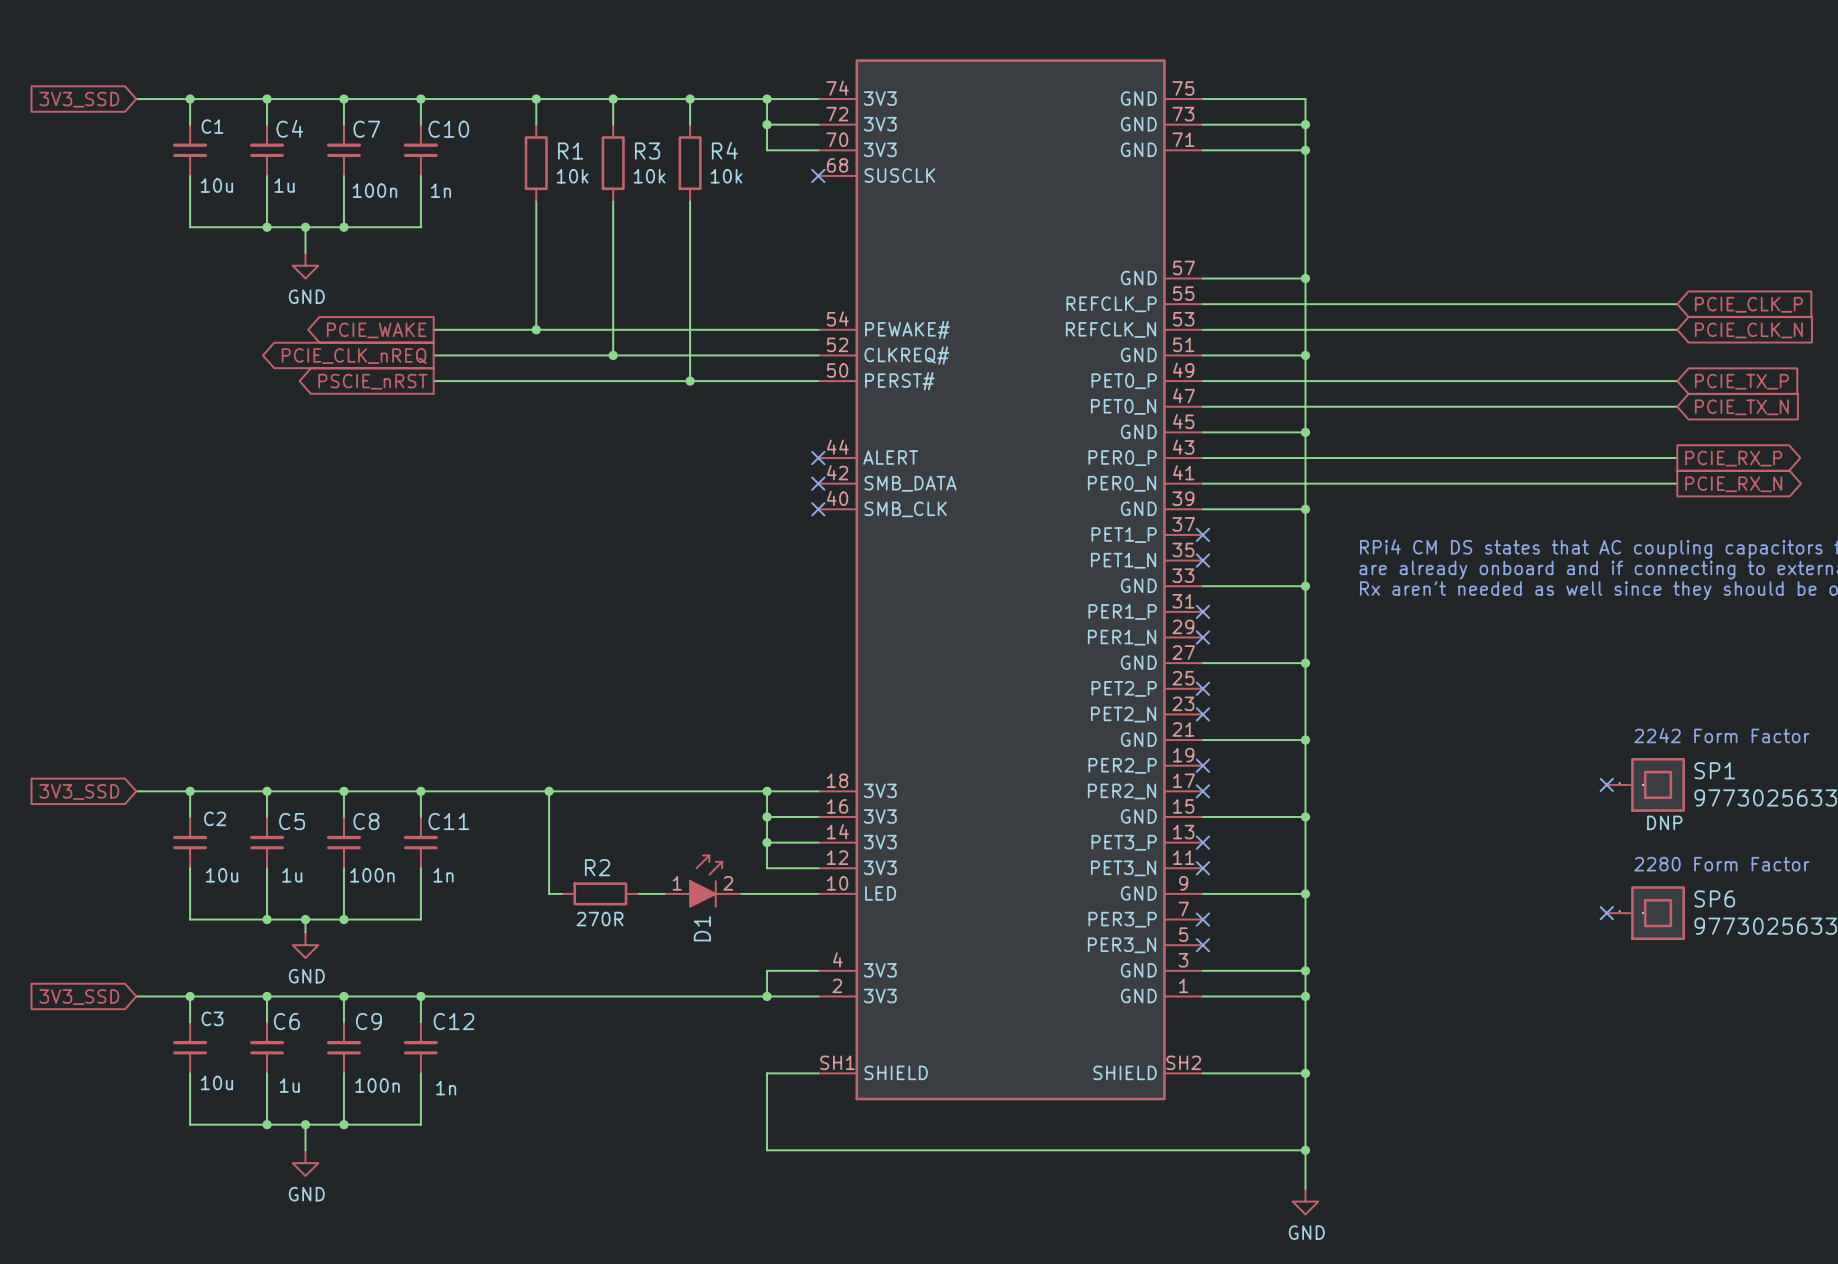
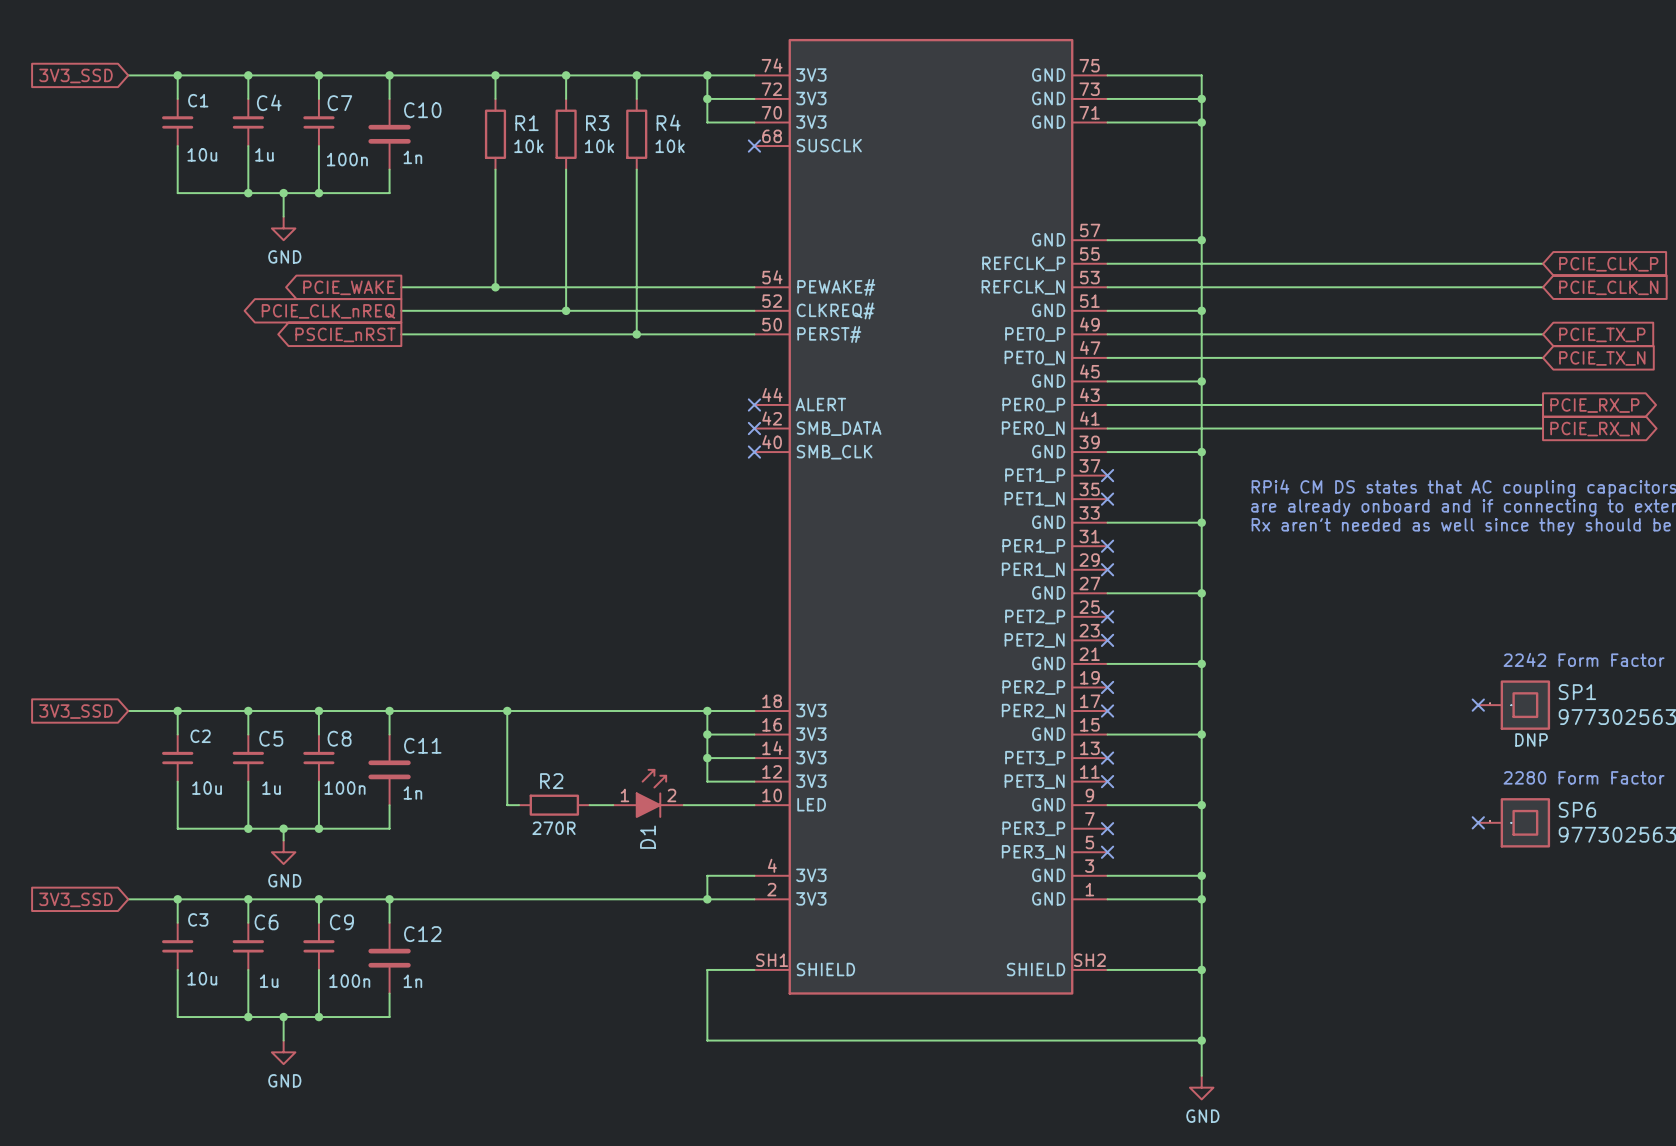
C10 symbol: [403, 124, 438, 176] -> [368, 98, 411, 170]
C11 symbol: [403, 816, 438, 869] -> [368, 734, 411, 806]
C12 symbol: [403, 1022, 438, 1074] -> [368, 922, 411, 994]

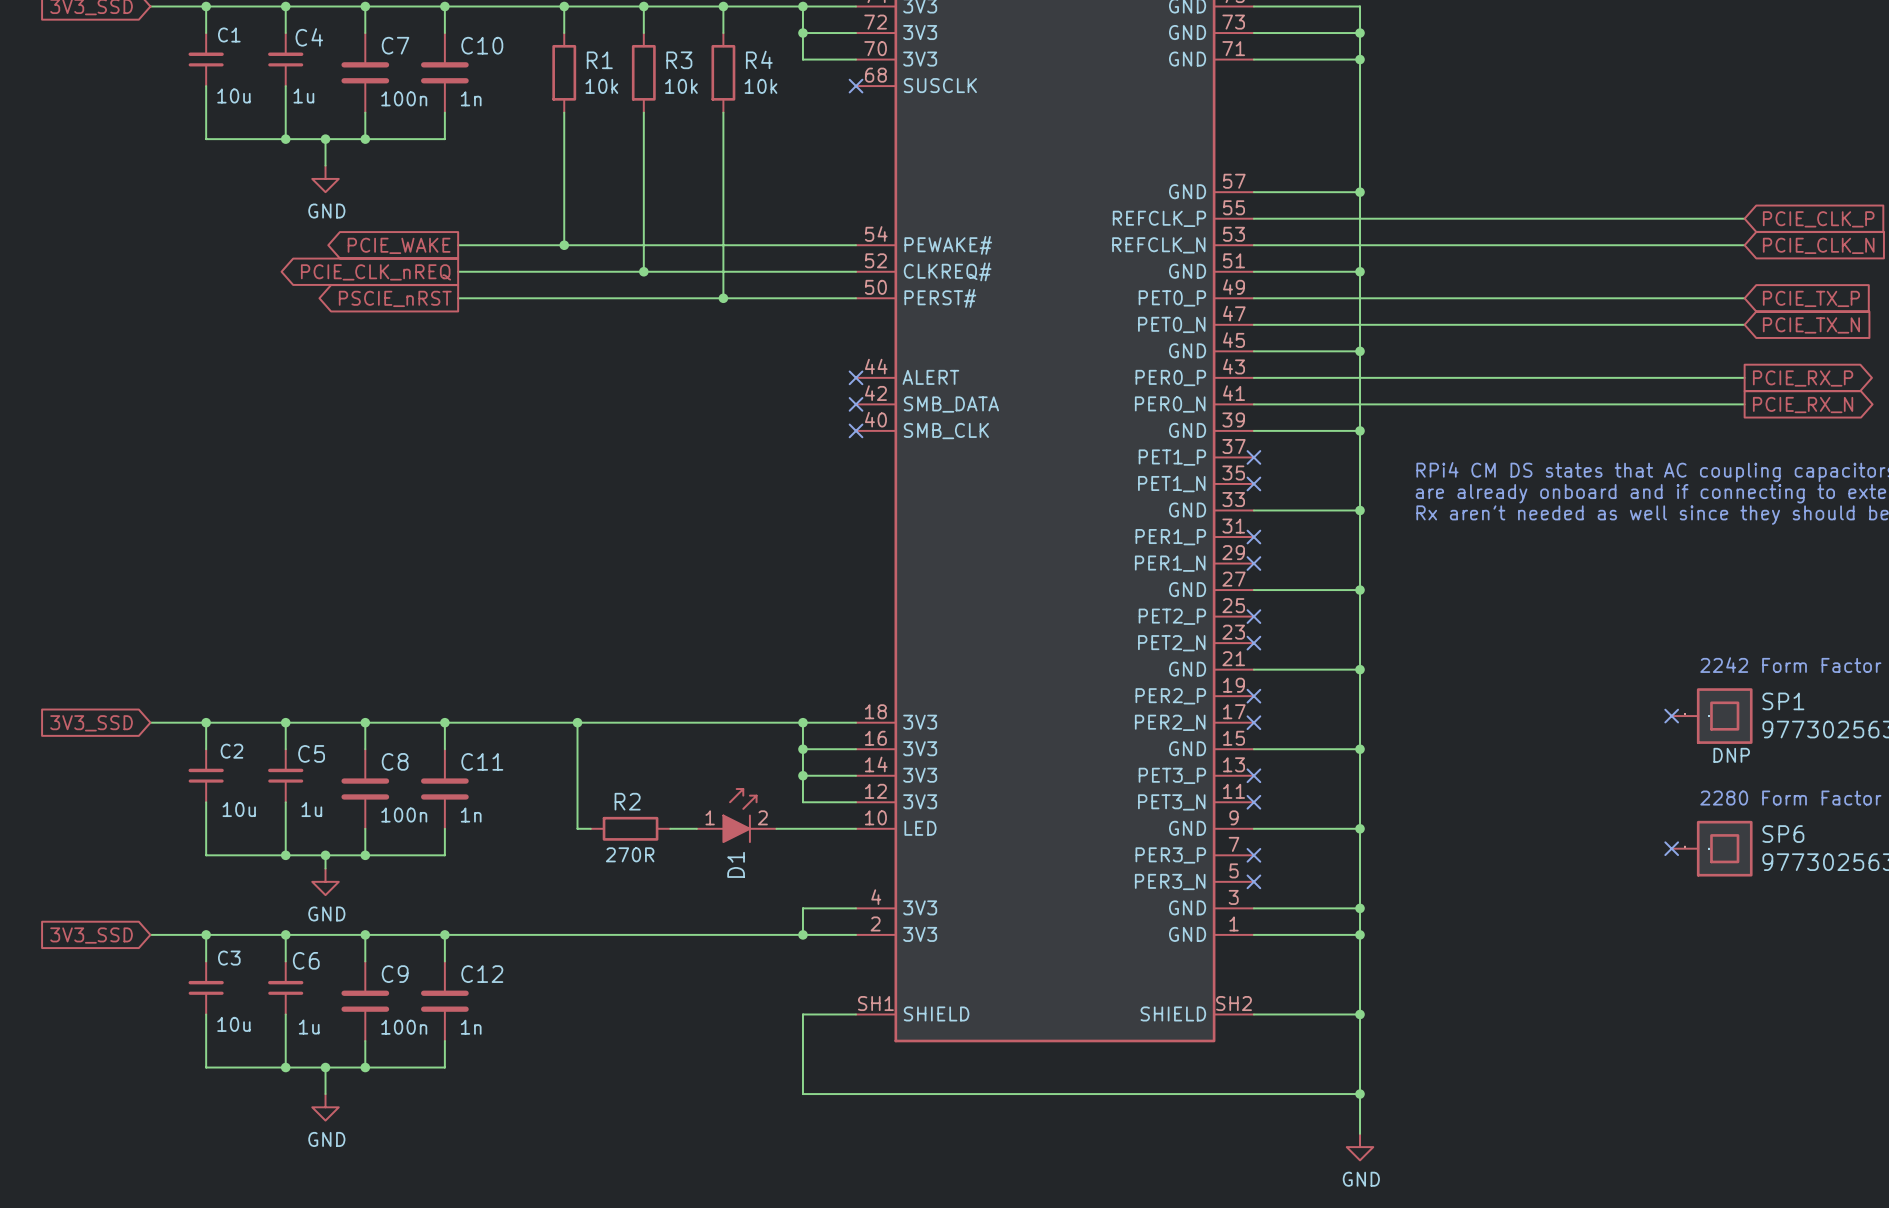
C7 symbol: [303, 98, 335, 147] -> [341, 33, 390, 113]
C8 symbol: [303, 734, 335, 782] -> [341, 749, 390, 829]
C9 symbol: [303, 922, 335, 970] -> [341, 961, 390, 1042]

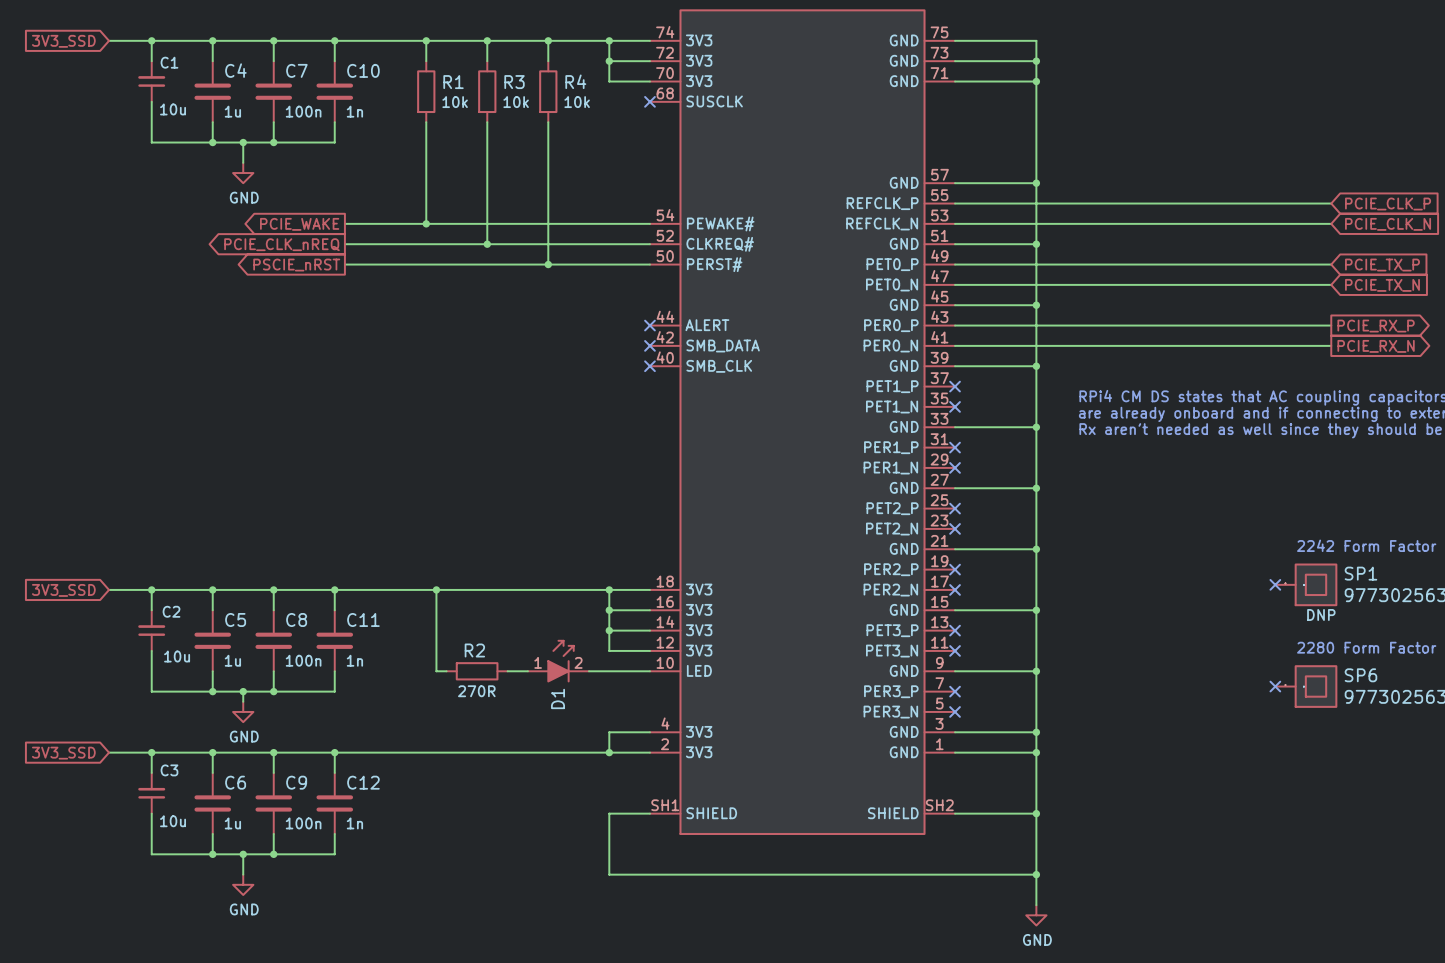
C4 symbol: [268, 33, 304, 87] -> [194, 61, 232, 123]
C5 symbol: [268, 749, 304, 803] -> [194, 610, 232, 672]
C6 symbol: [268, 961, 304, 1015] -> [194, 772, 232, 834]

